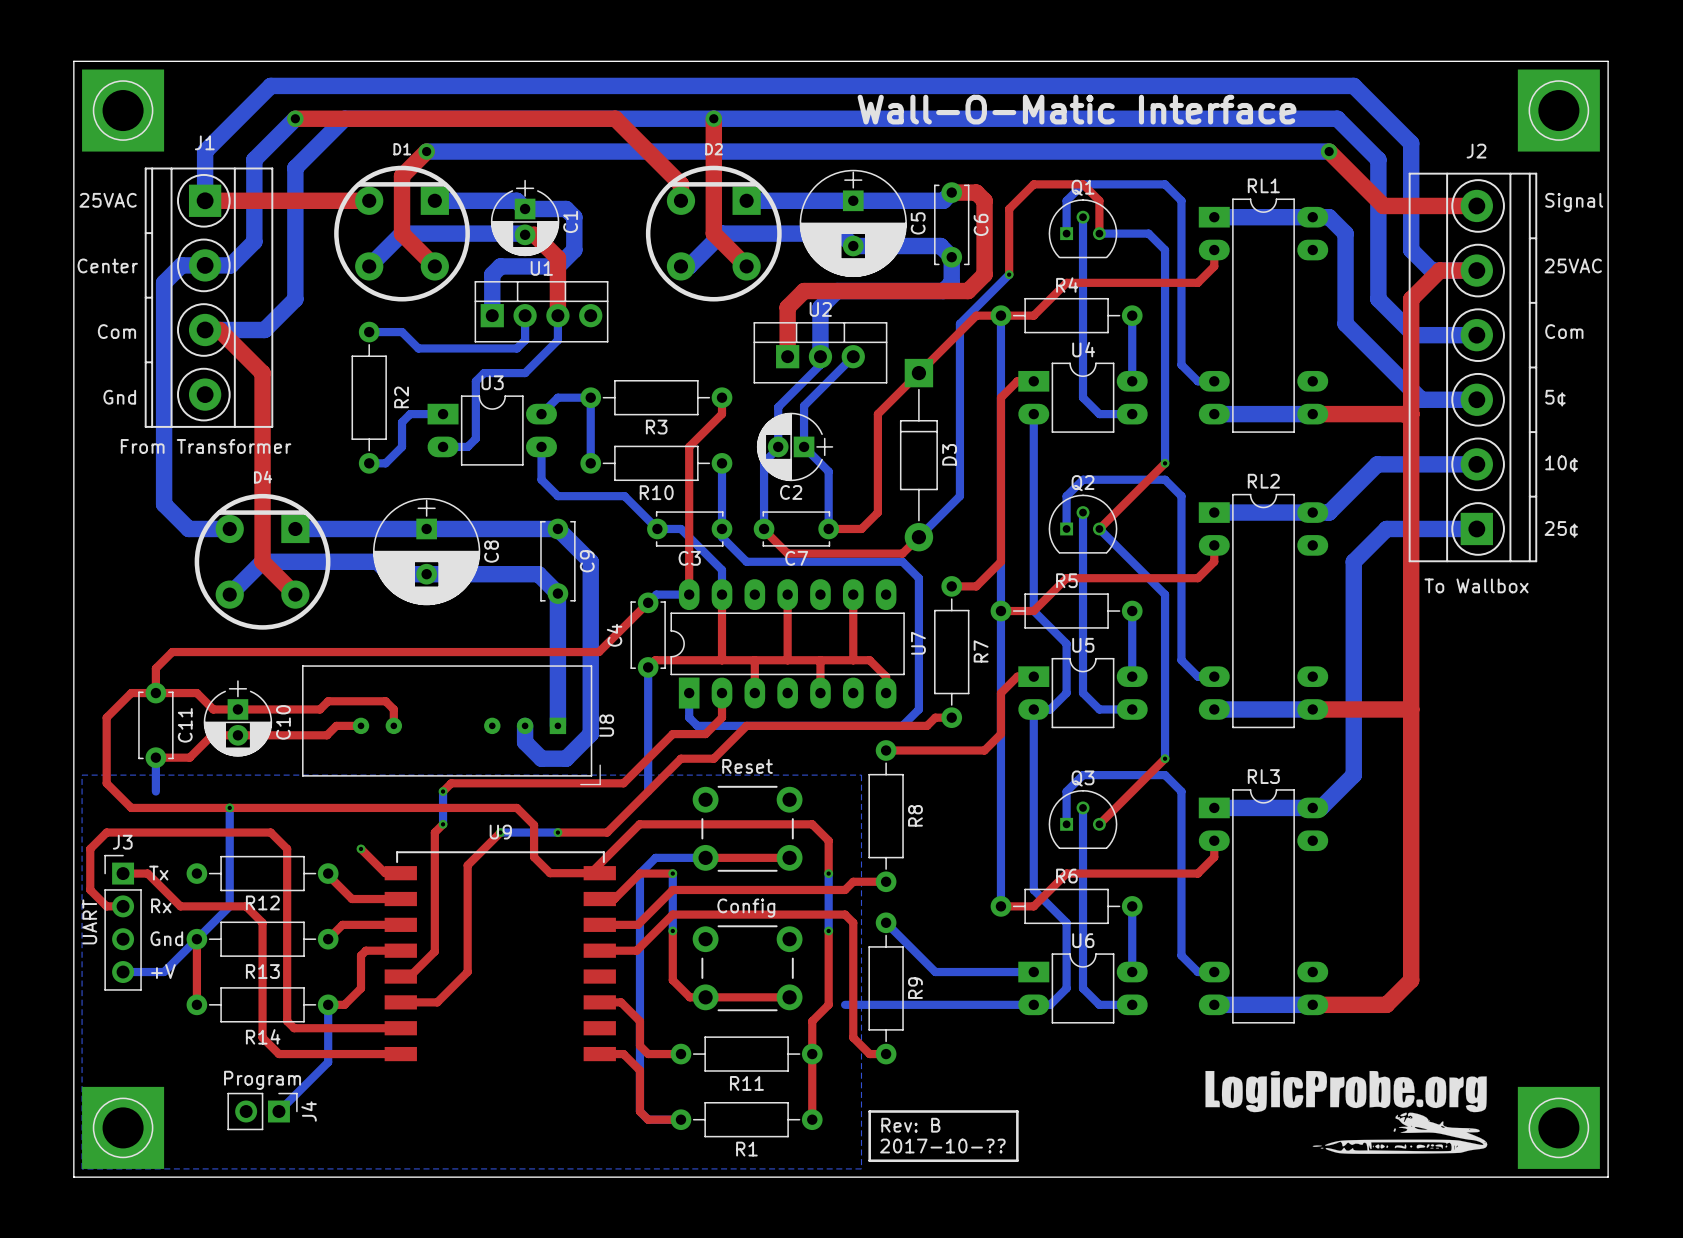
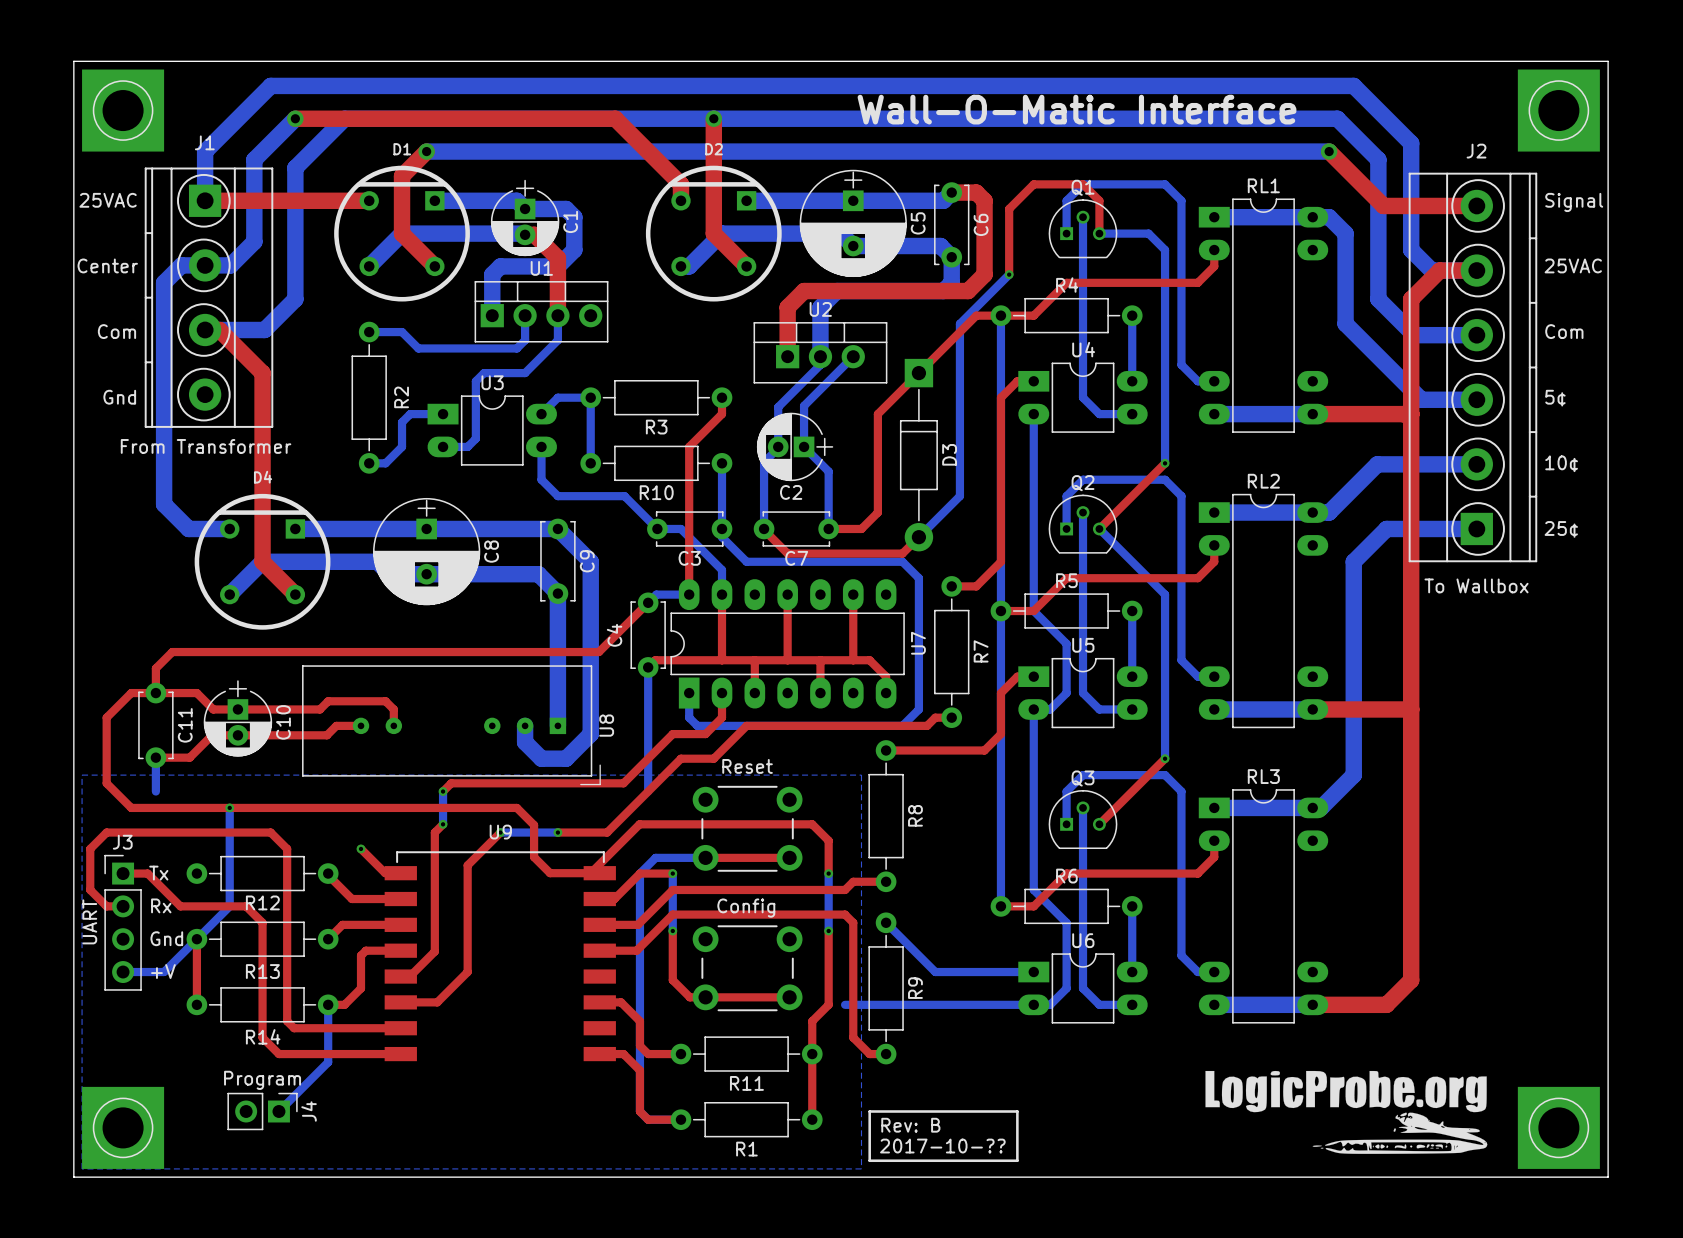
D1 footprint: [334, 165, 470, 302] -> [334, 165, 470, 302]
D2 footprint: [645, 165, 782, 302] -> [645, 165, 782, 302]
D4 footprint: [194, 493, 331, 630] -> [194, 493, 331, 630]

